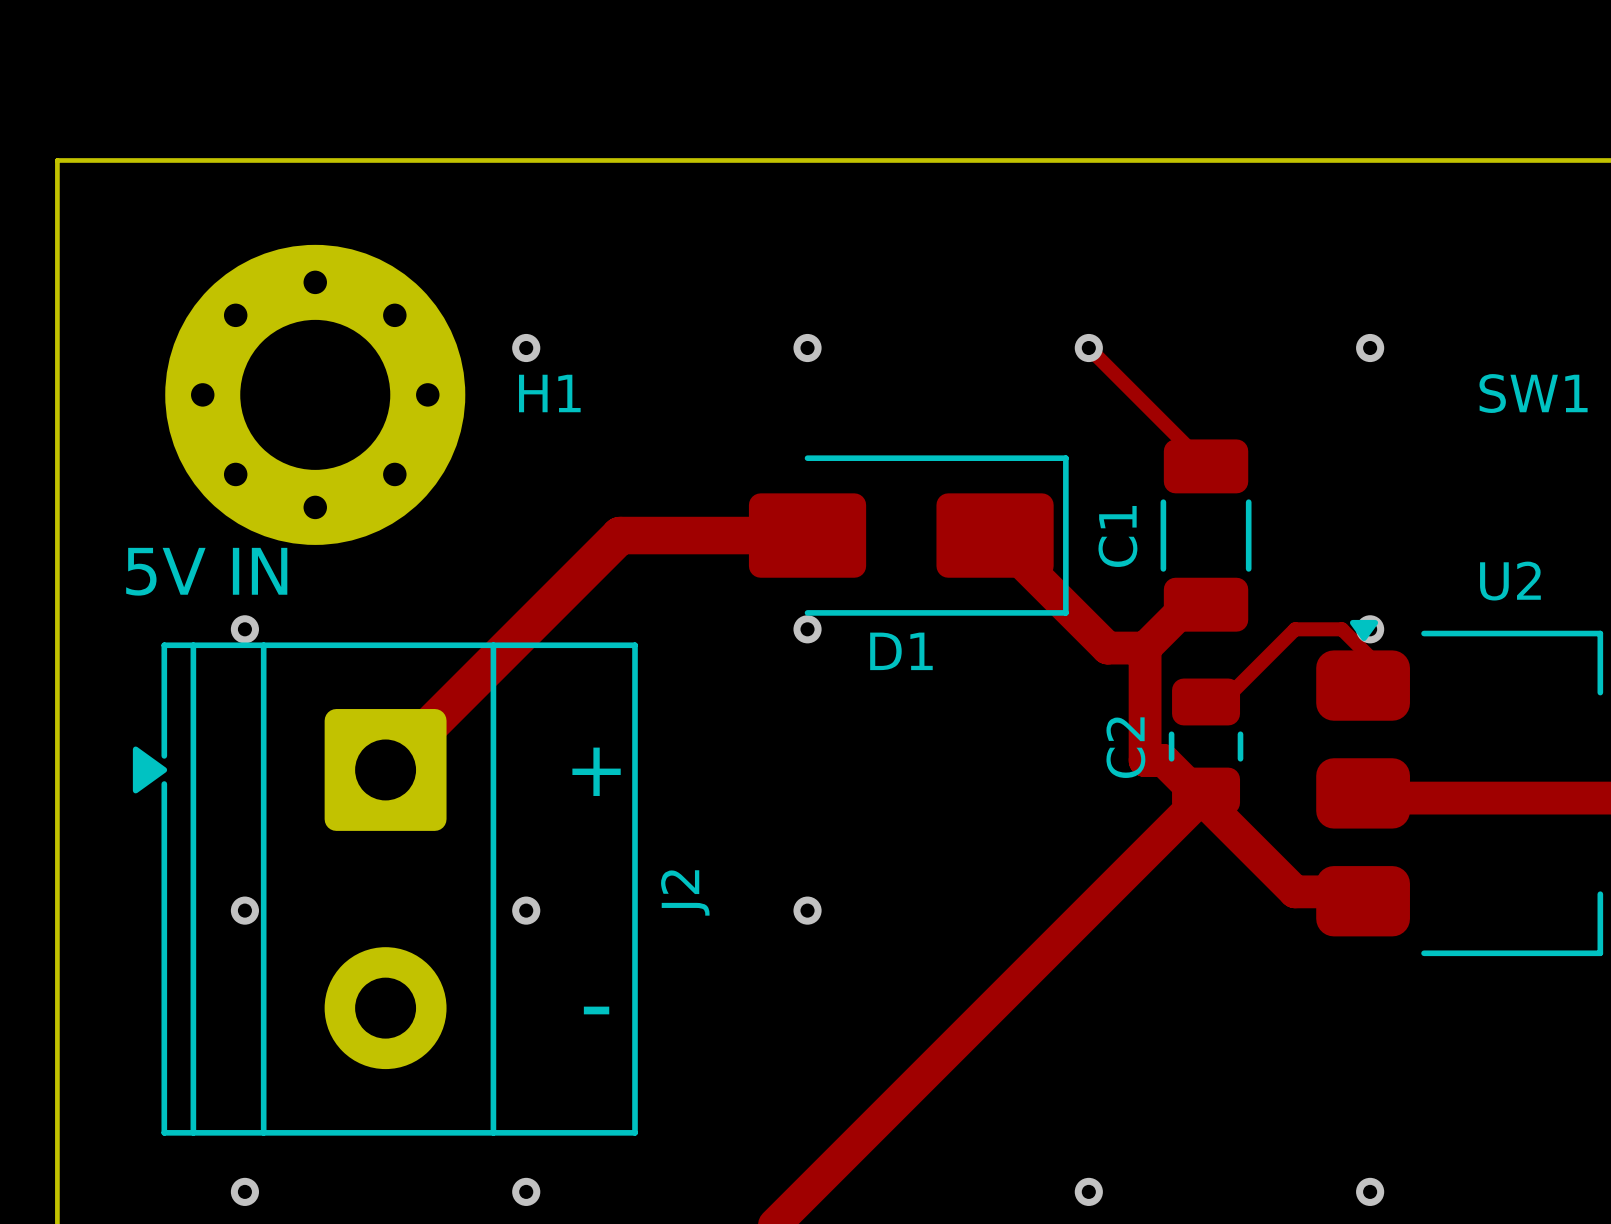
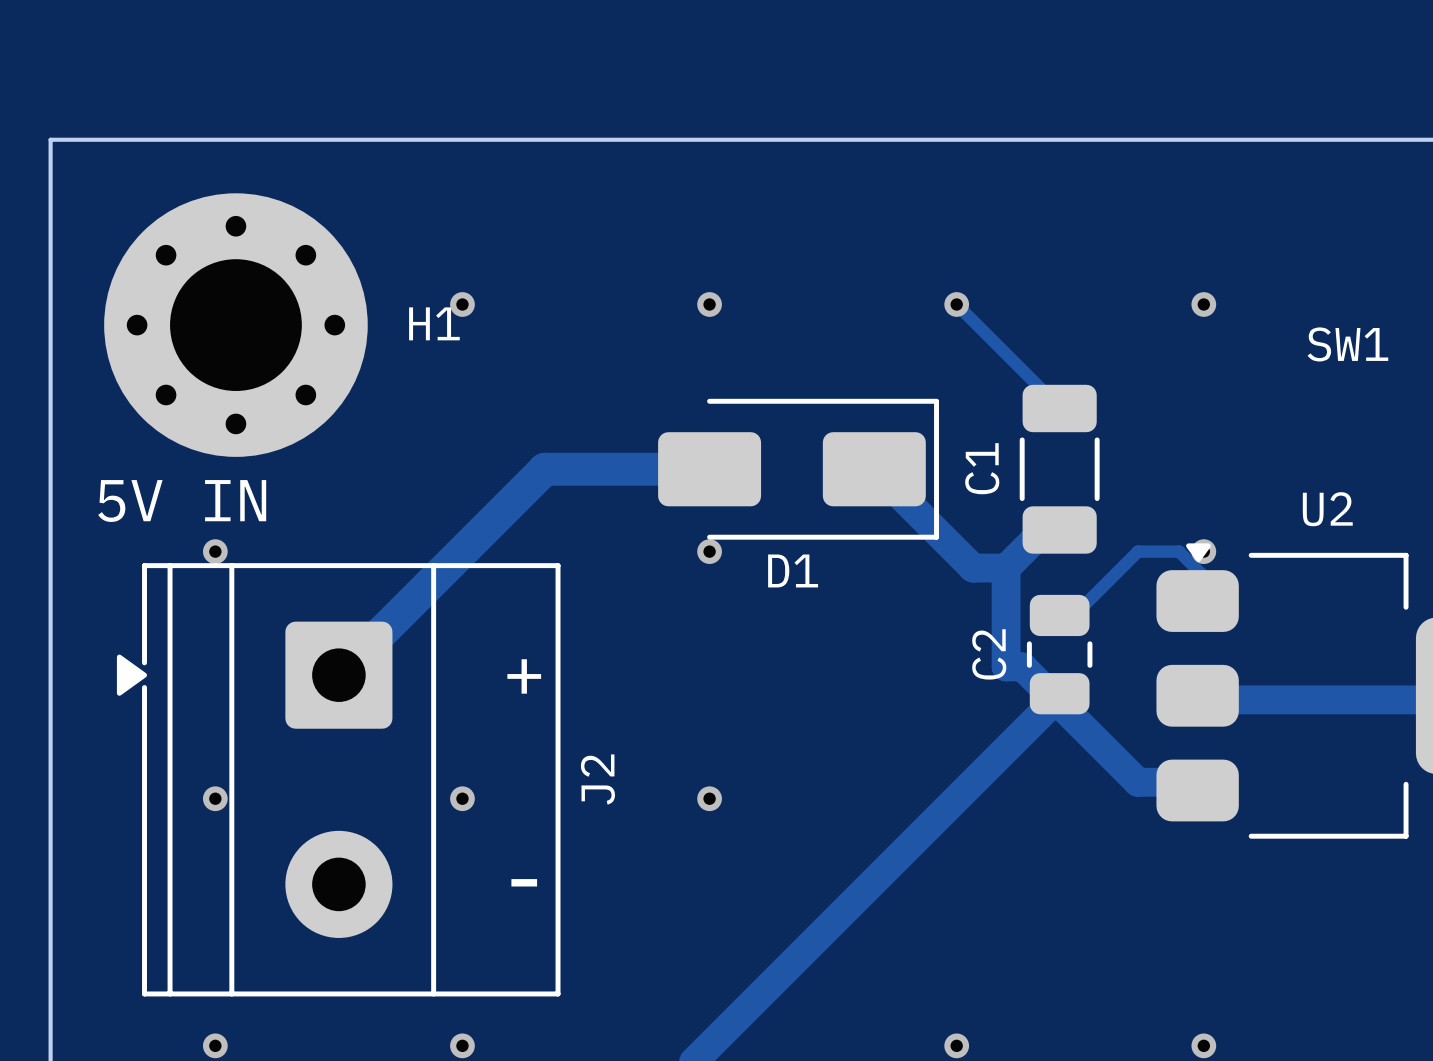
H1 name position: H1 (549, 393) -> H1 (434, 323)
H1 position: (315, 394) -> (235, 325)

